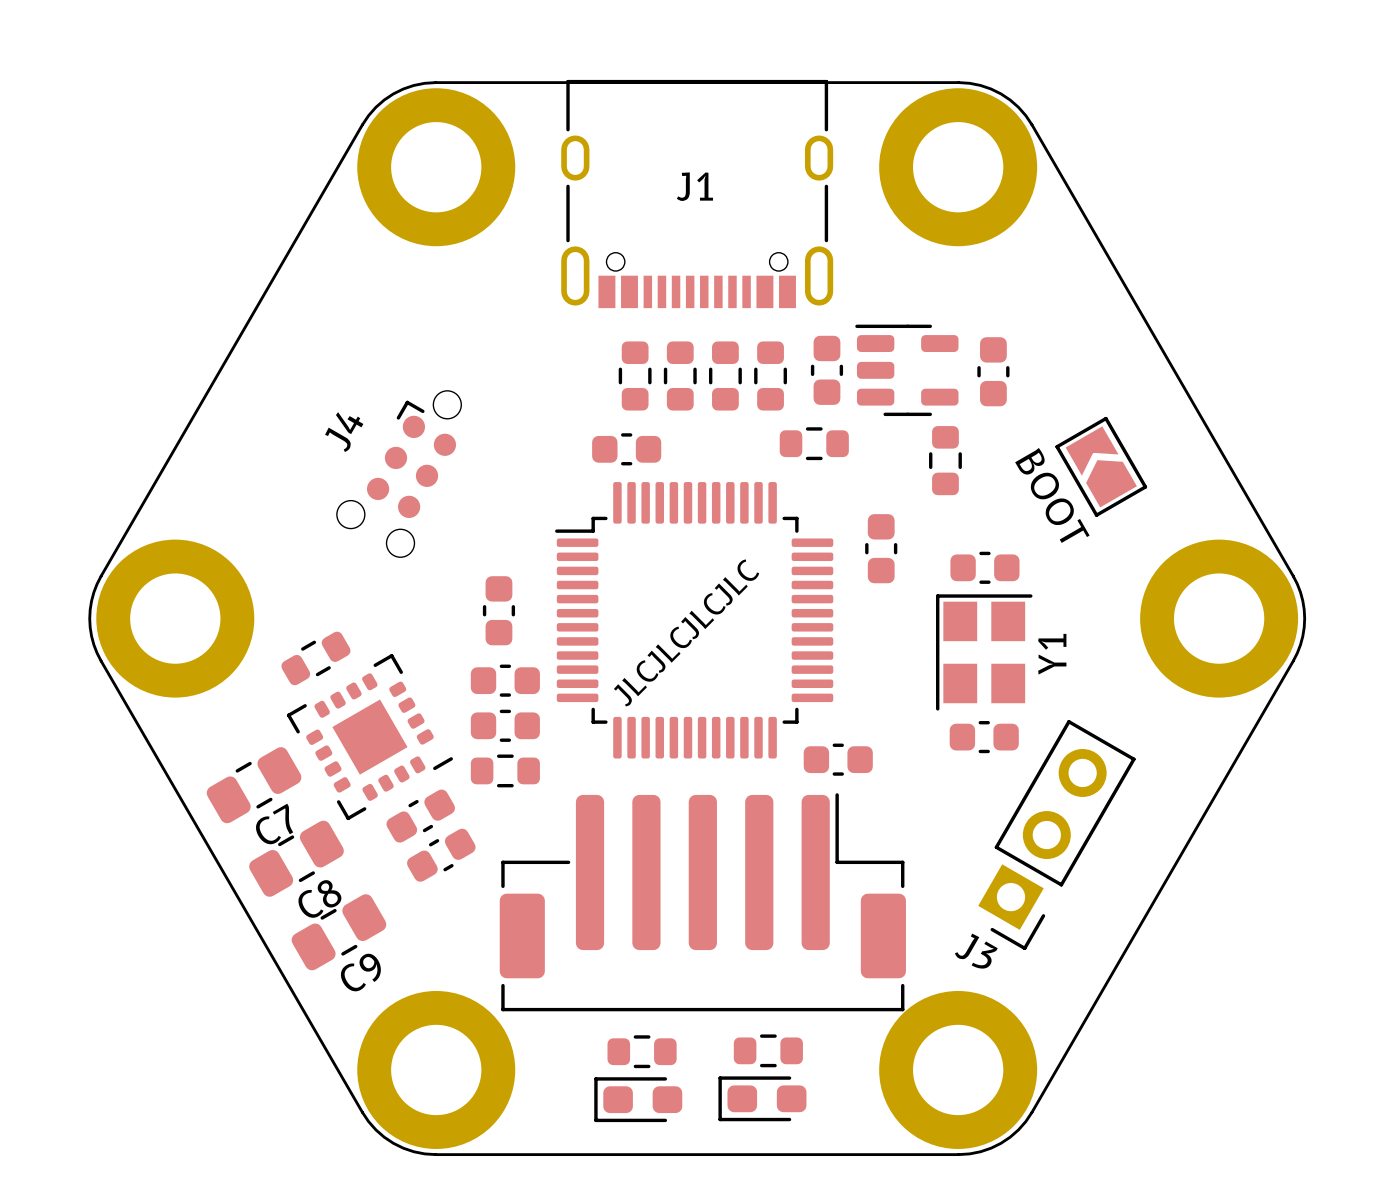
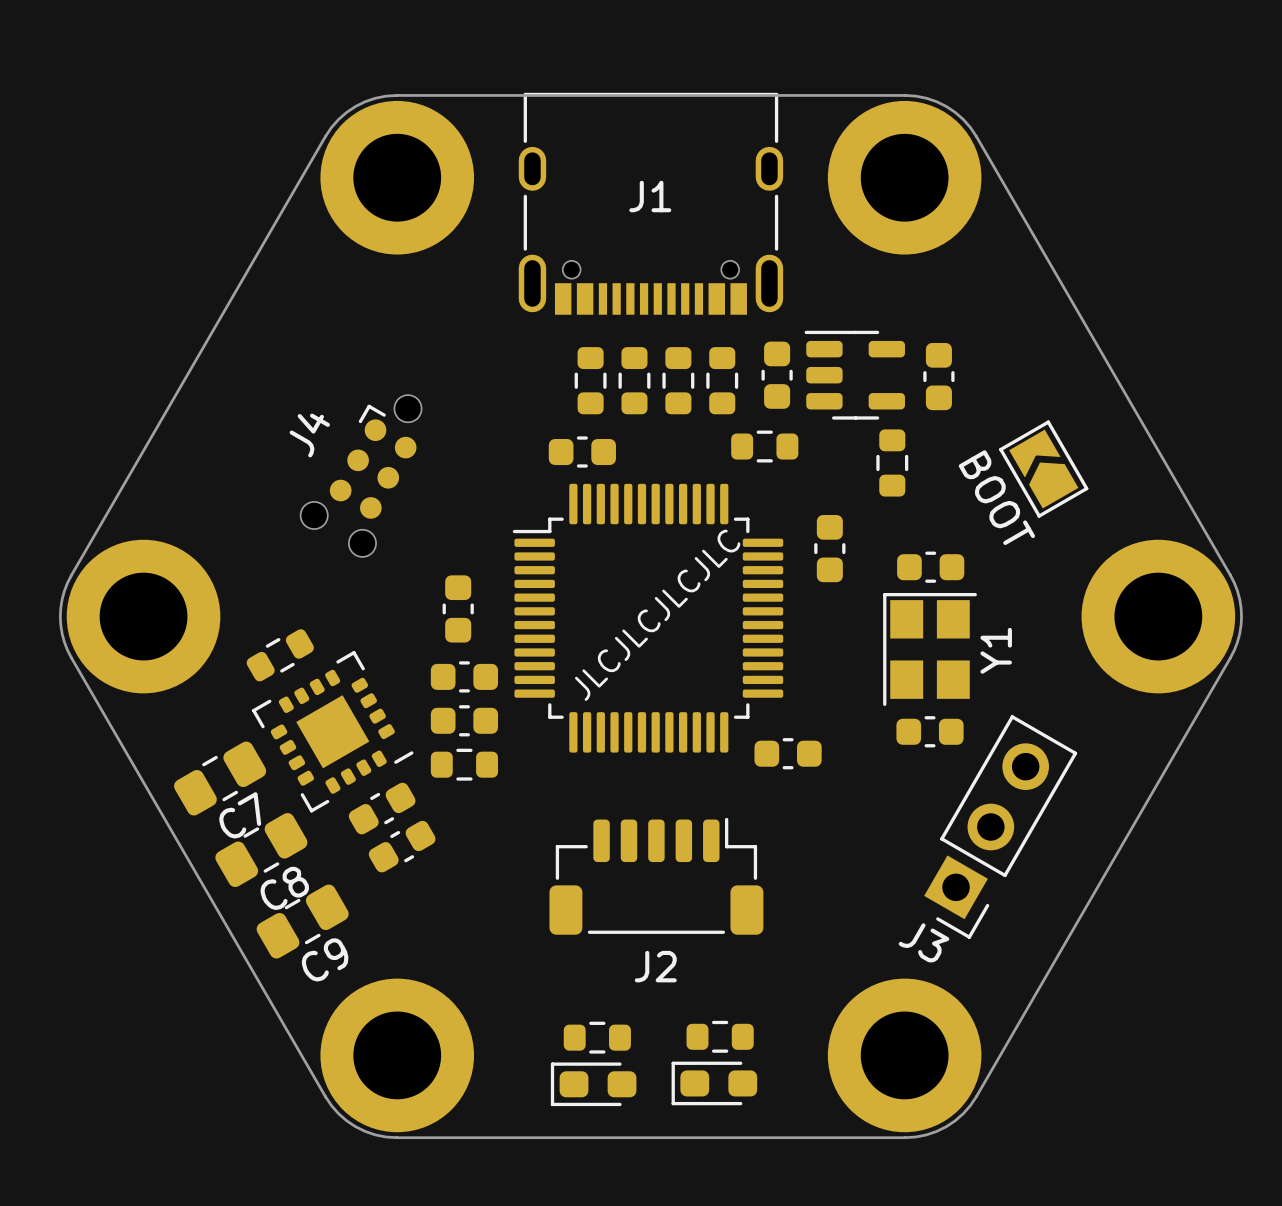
J2: none -> (656, 876)
part: (702, 902) -> none

